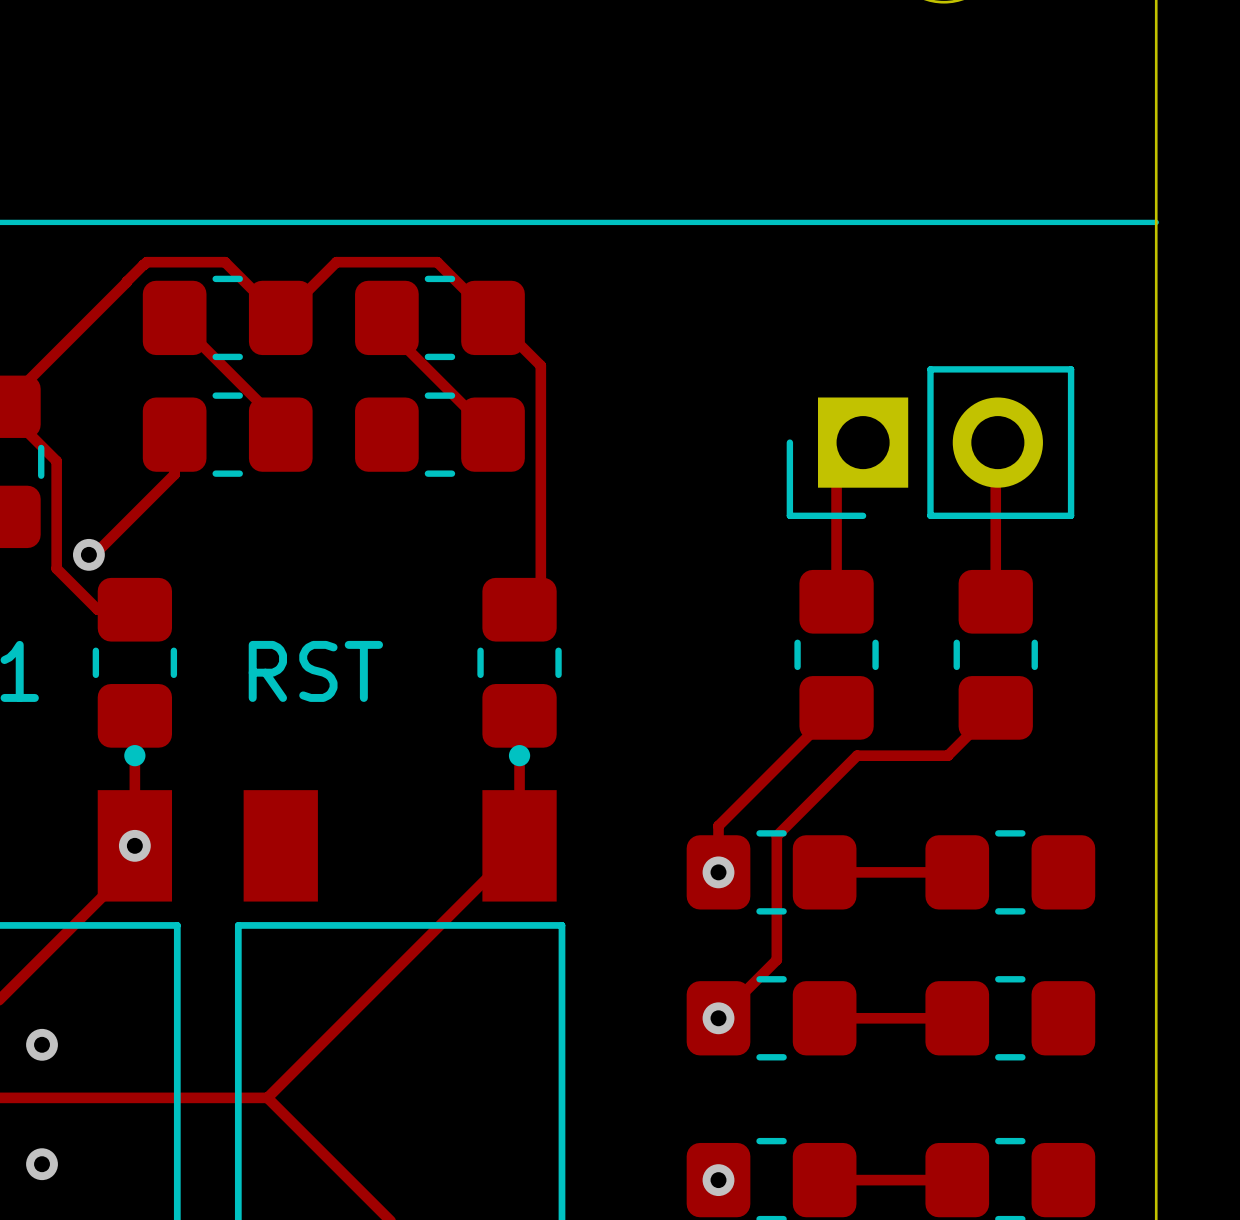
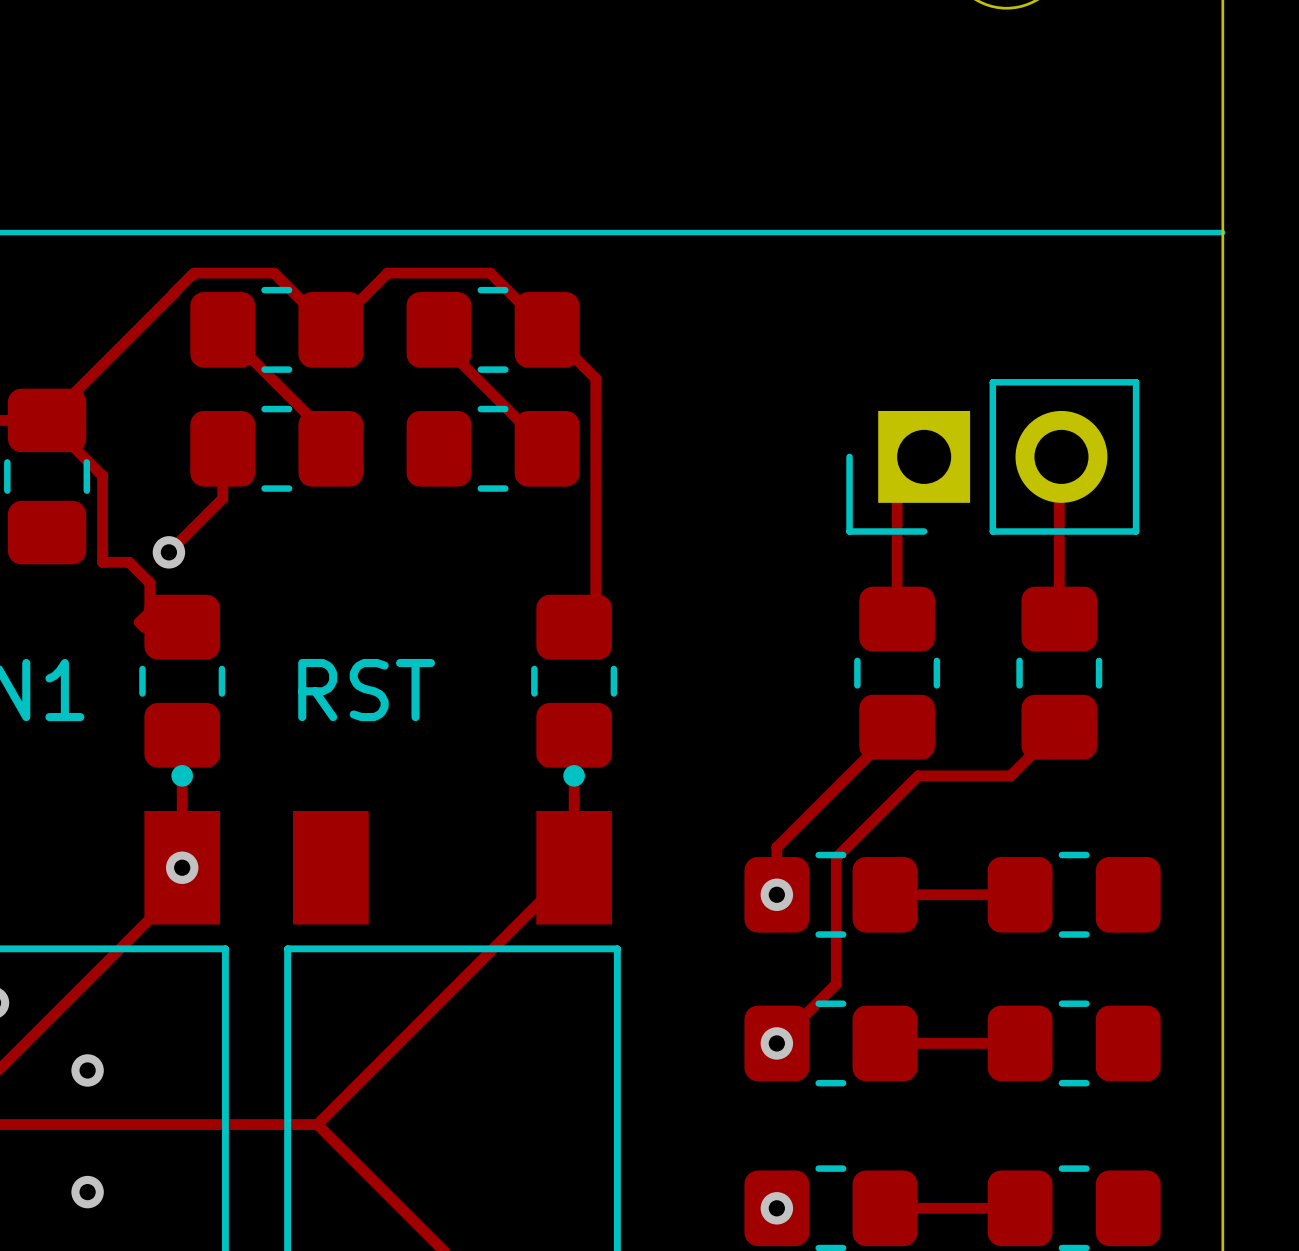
track: (174, 474) (94, 554) (88, 554) -> (222, 489) (222, 498) (168, 552)
track: (56, 546) (56, 568) (92, 604) -> (102, 562) (129, 562) (149, 582) (149, 612) (139, 622)
via position: (88, 554) -> (168, 552)

